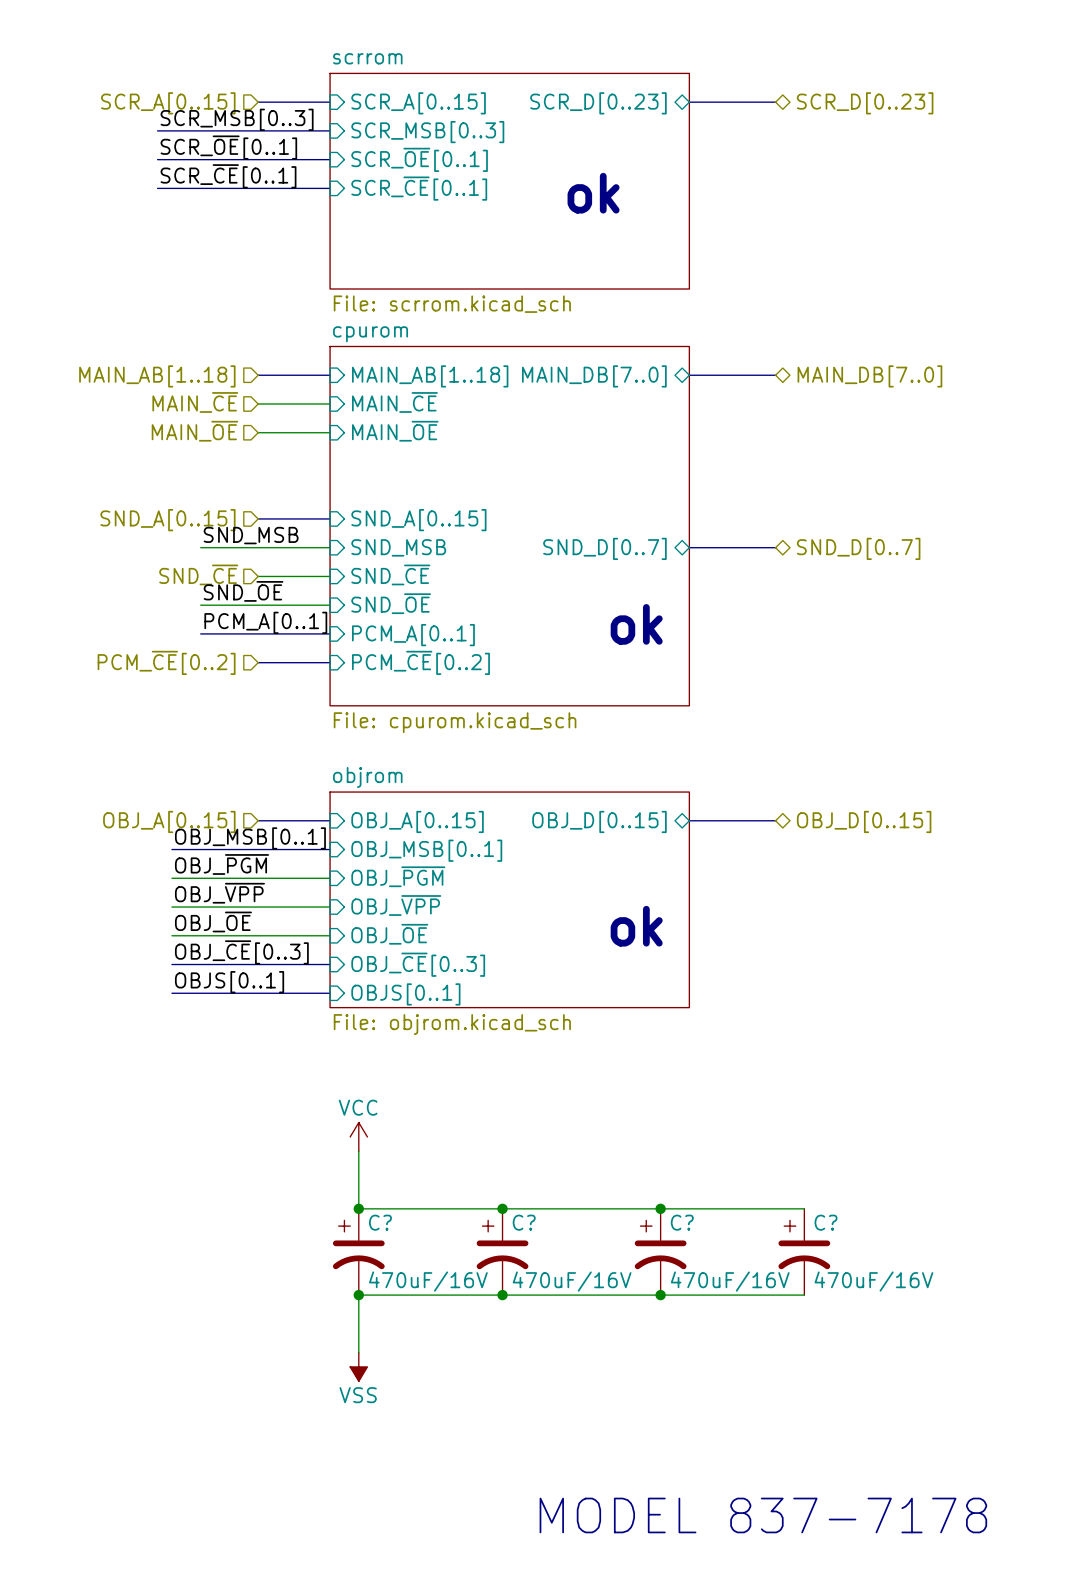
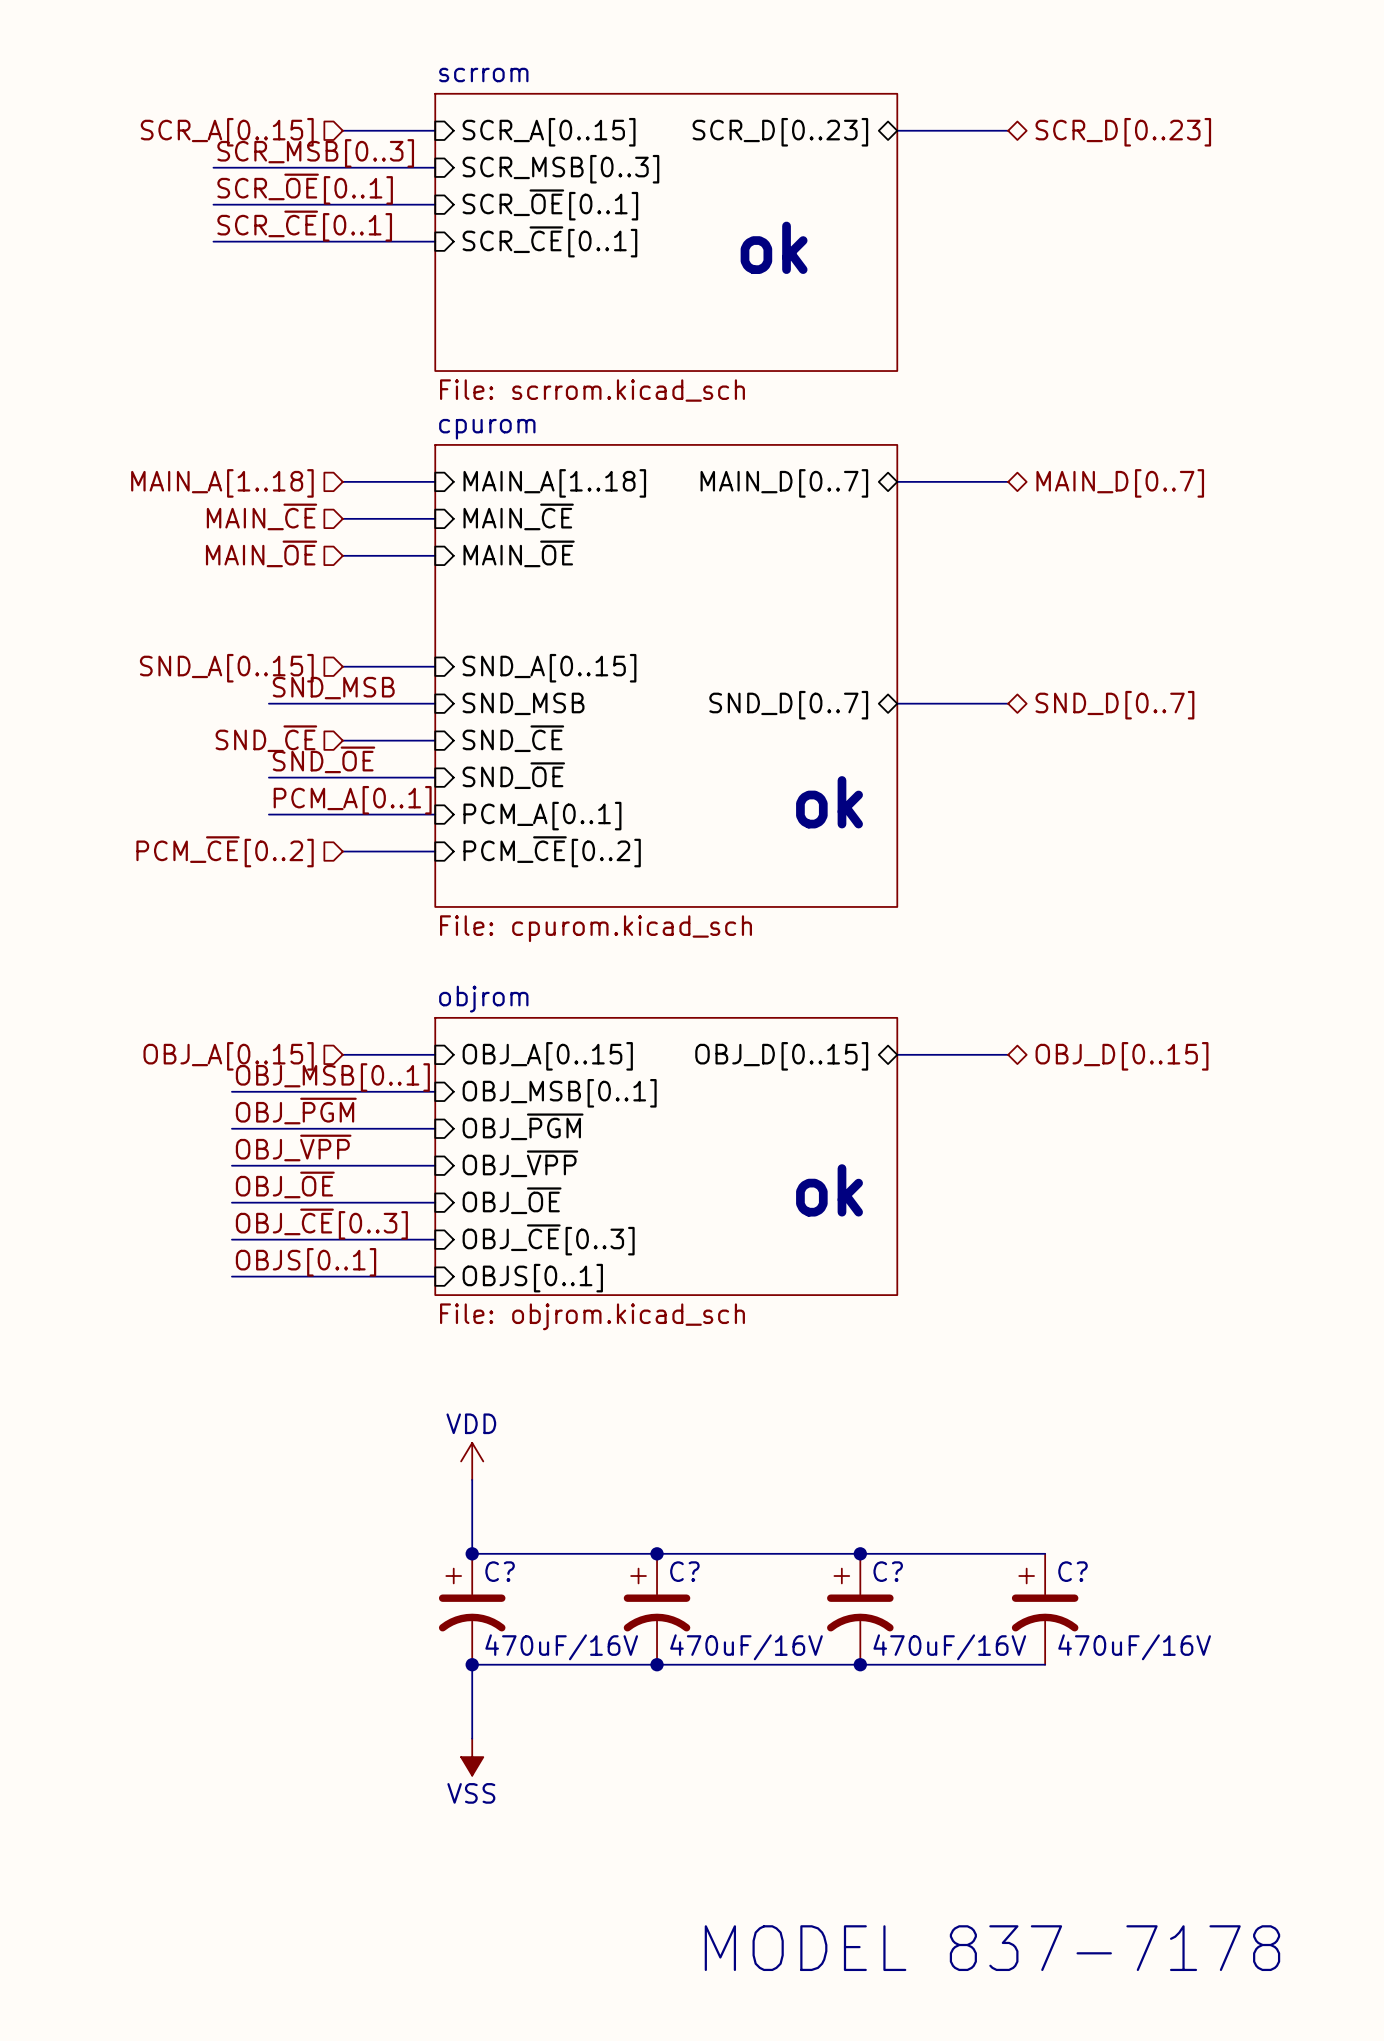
hierarchical label: MAIN_AB[1..18] (157, 376) -> MAIN_A[1..18] (222, 483)
sheet pin: MAIN_AB[1..18] (430, 376) -> MAIN_A[1..18] (554, 483)
sheet pin: MAIN_DB[7..0] (594, 376) -> MAIN_D[0..7] (784, 483)
hierarchical label: MAIN_DB[7..0] (869, 376) -> MAIN_D[0..7] (1120, 483)
power symbol: VCC (358, 1136) -> VDD (472, 1461)

